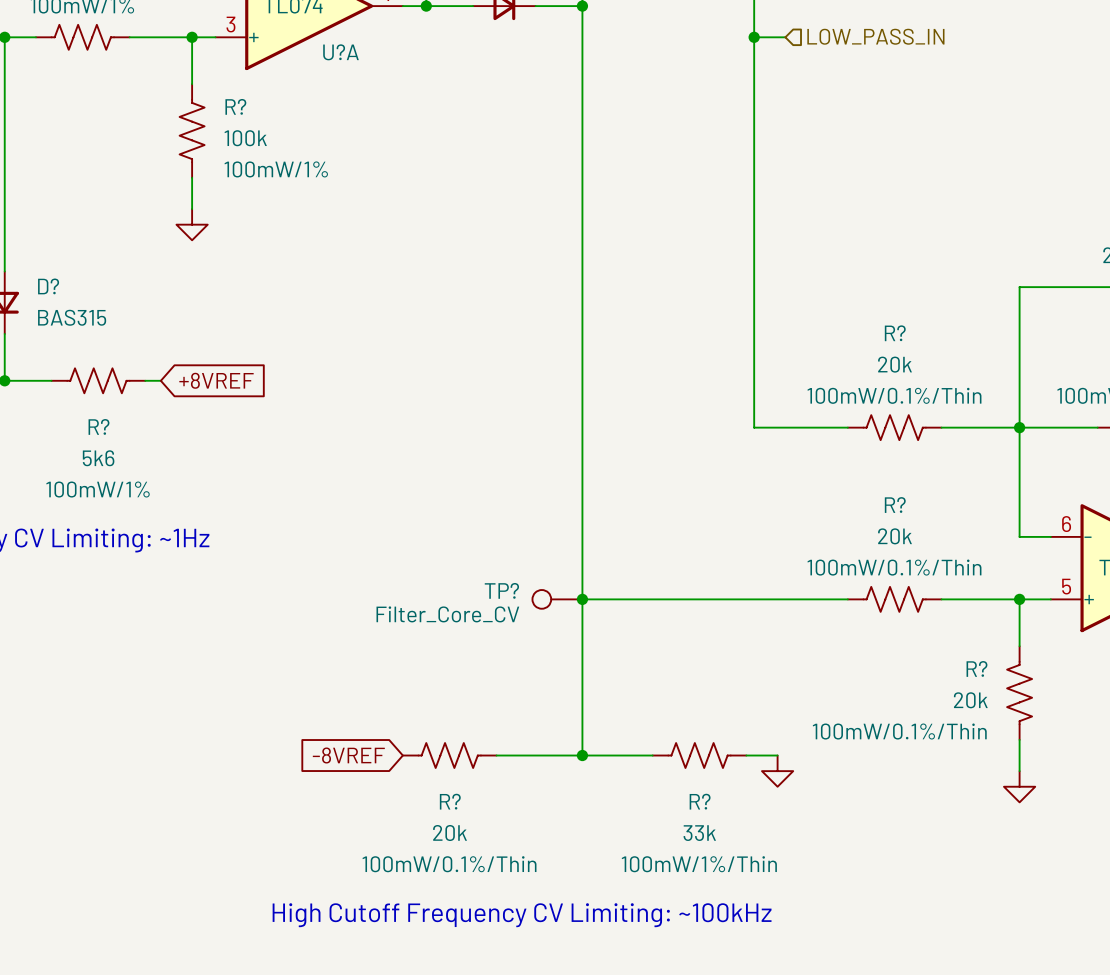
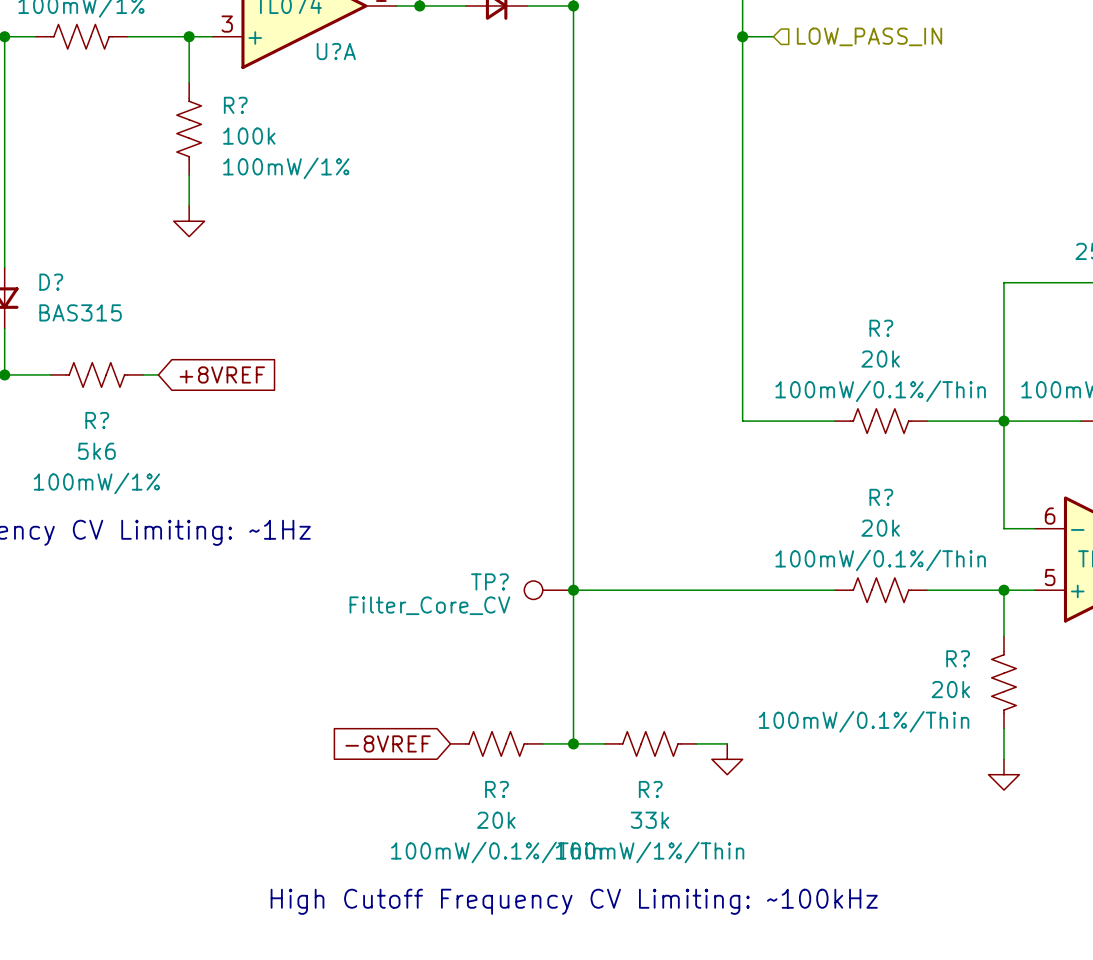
global label position: -8VREF (348, 755) -> -8VREF (388, 743)
R? position: (449, 755) -> (496, 743)
wire: (496, 755) (551, 755) -> none
R? position: (699, 755) -> (650, 743)
wire: (746, 755) (777, 755) -> (696, 743) (727, 743)
power symbol position: (777, 771) -> (727, 759)

